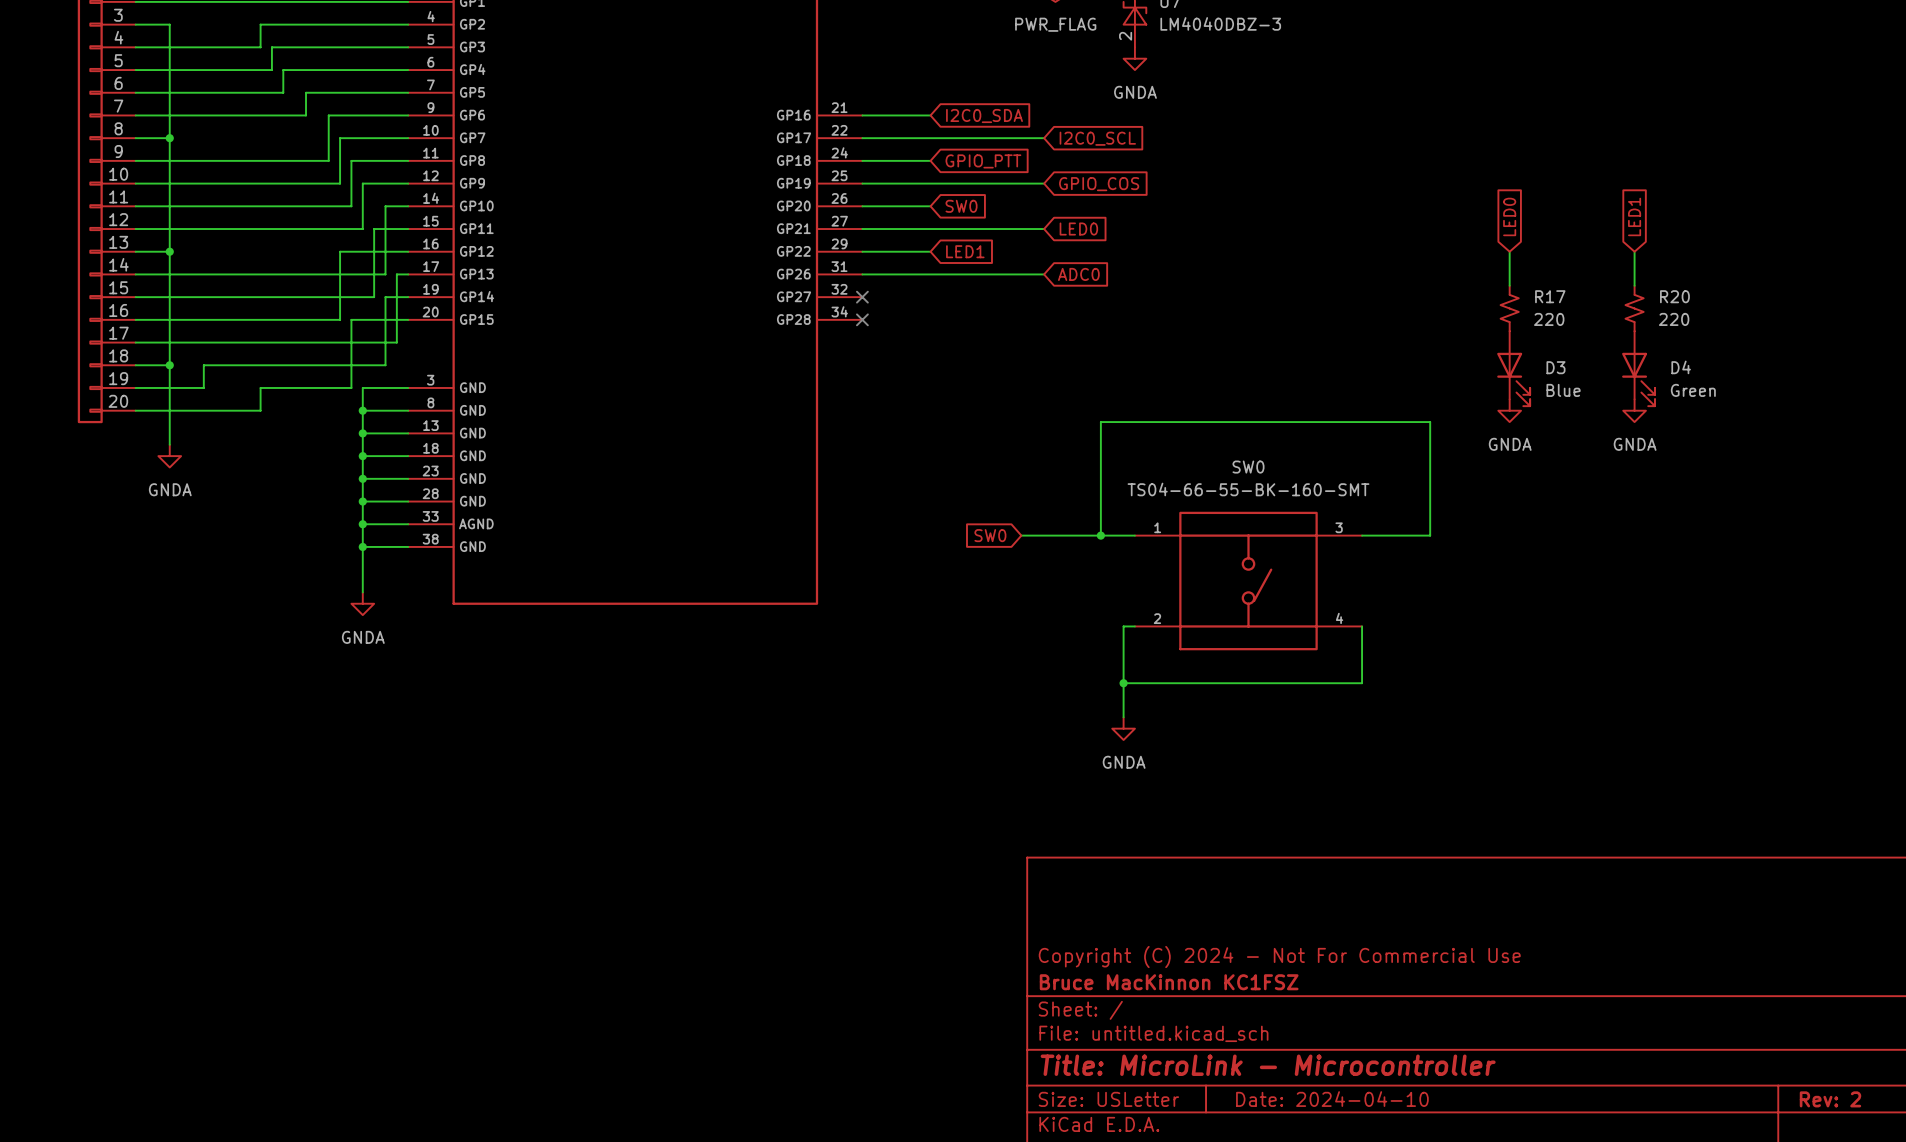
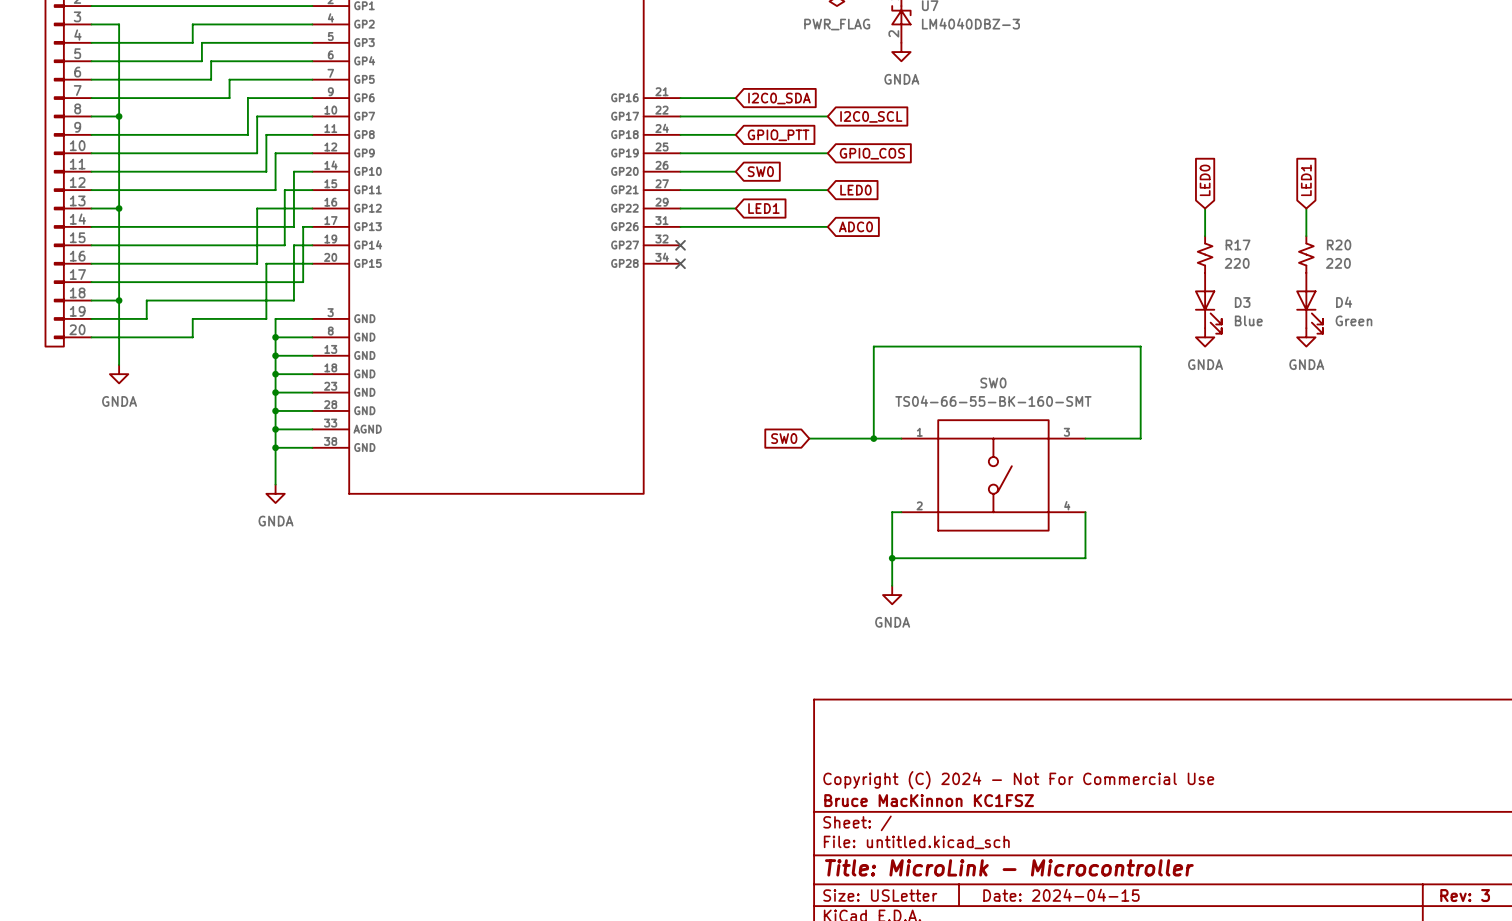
title block: Date: 2024-04-10 (1332, 1099) -> Date: 2024-04-15 (1061, 895)
title block: Rev: 2 (1830, 1099) -> Rev: 3 (1465, 895)

